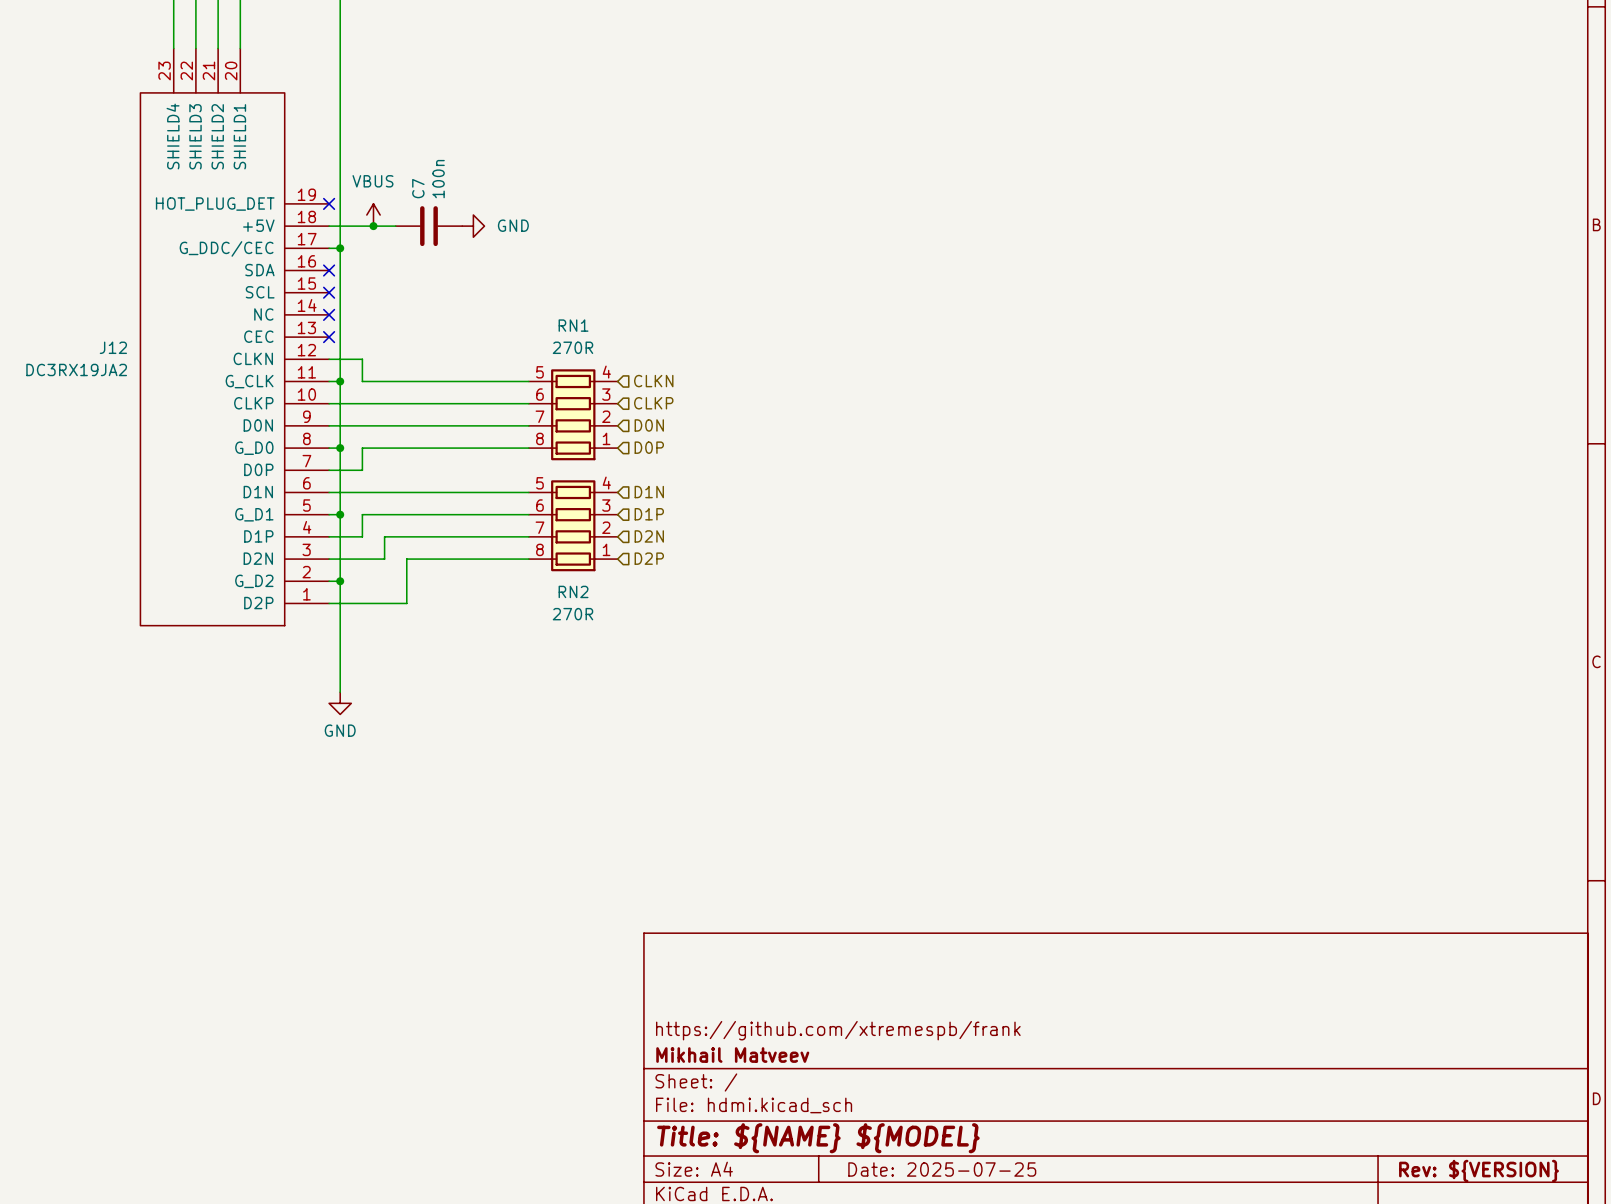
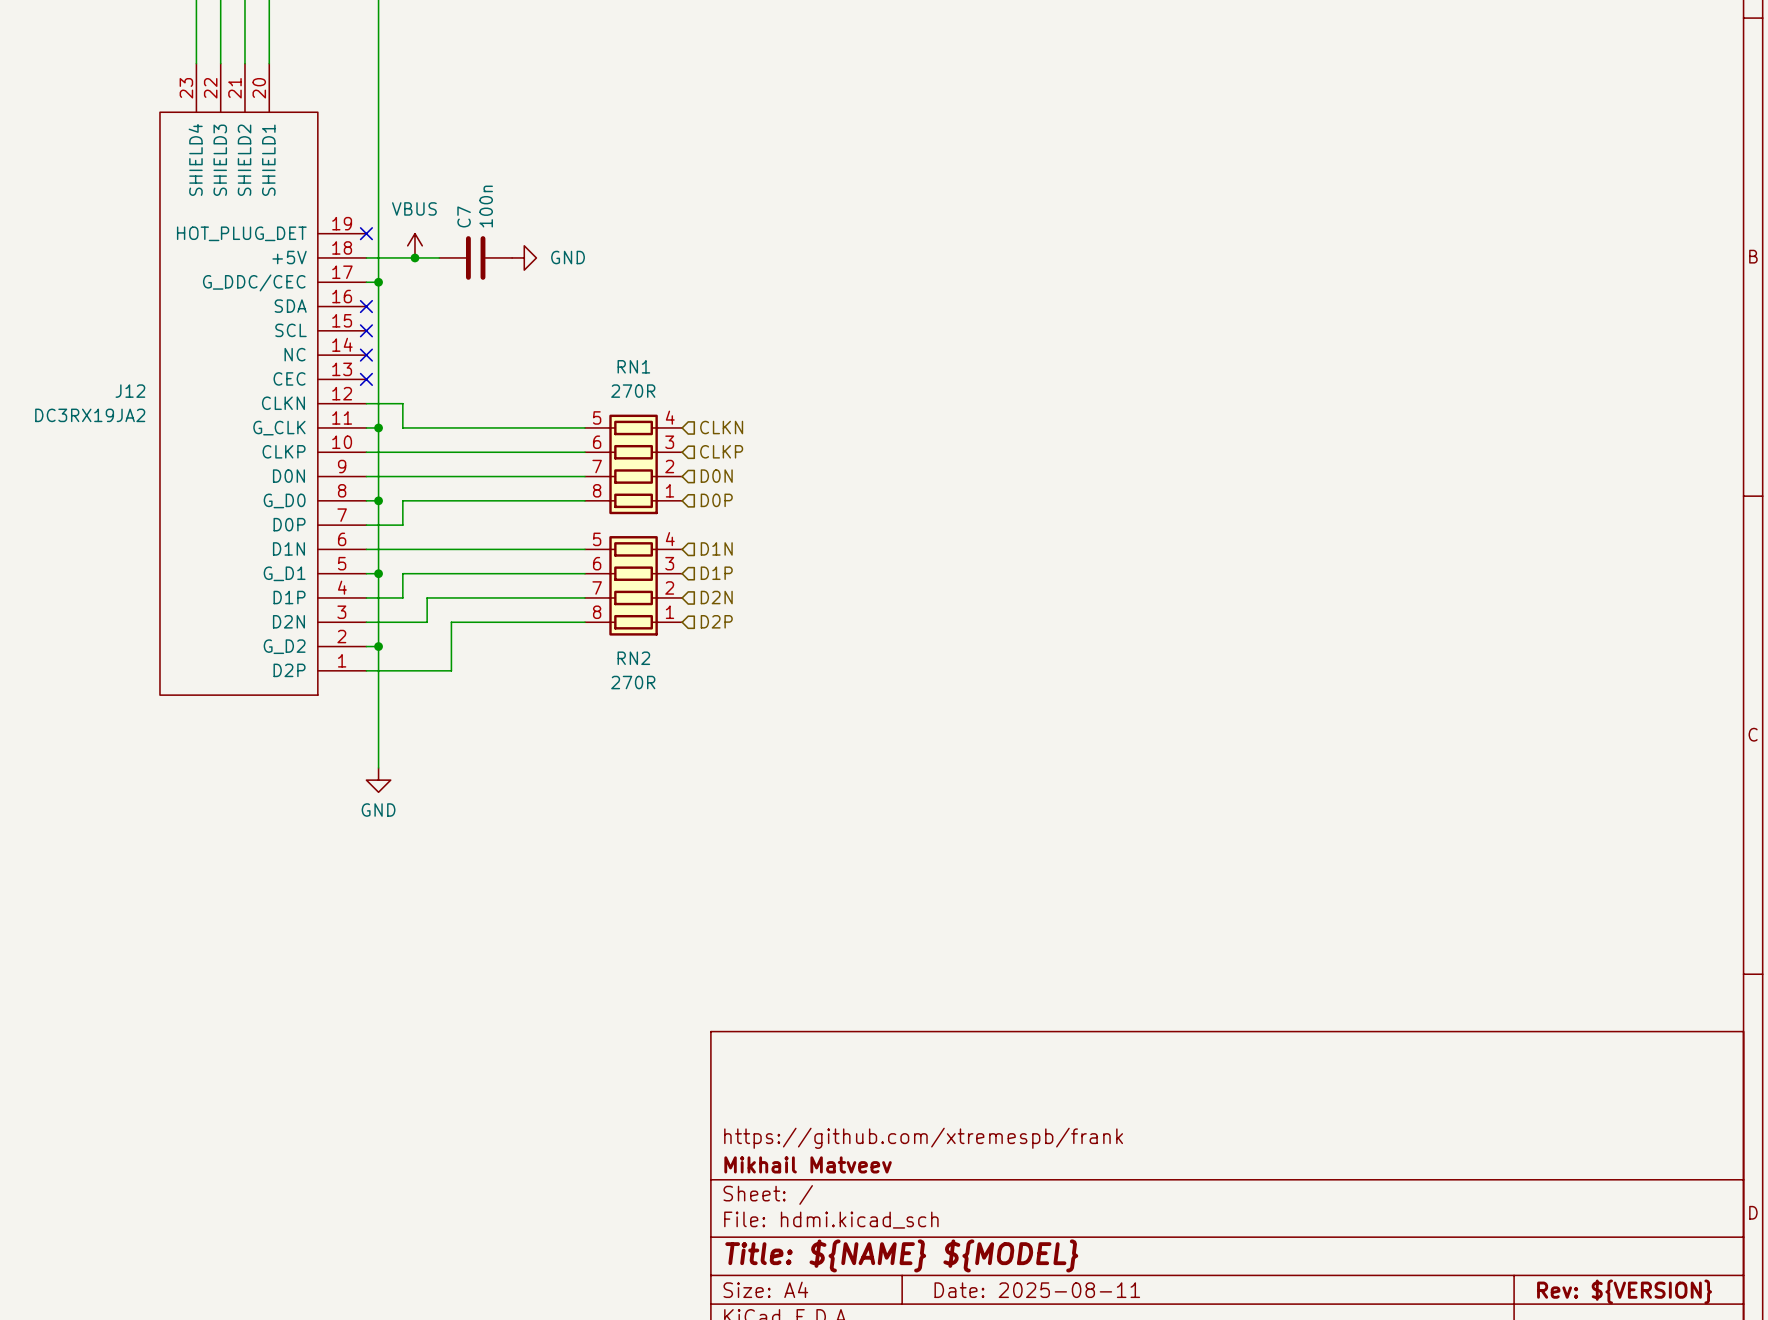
title block: Date: 2025-07-25 (942, 1169) -> Date: 2025-08-11 (1037, 1290)

